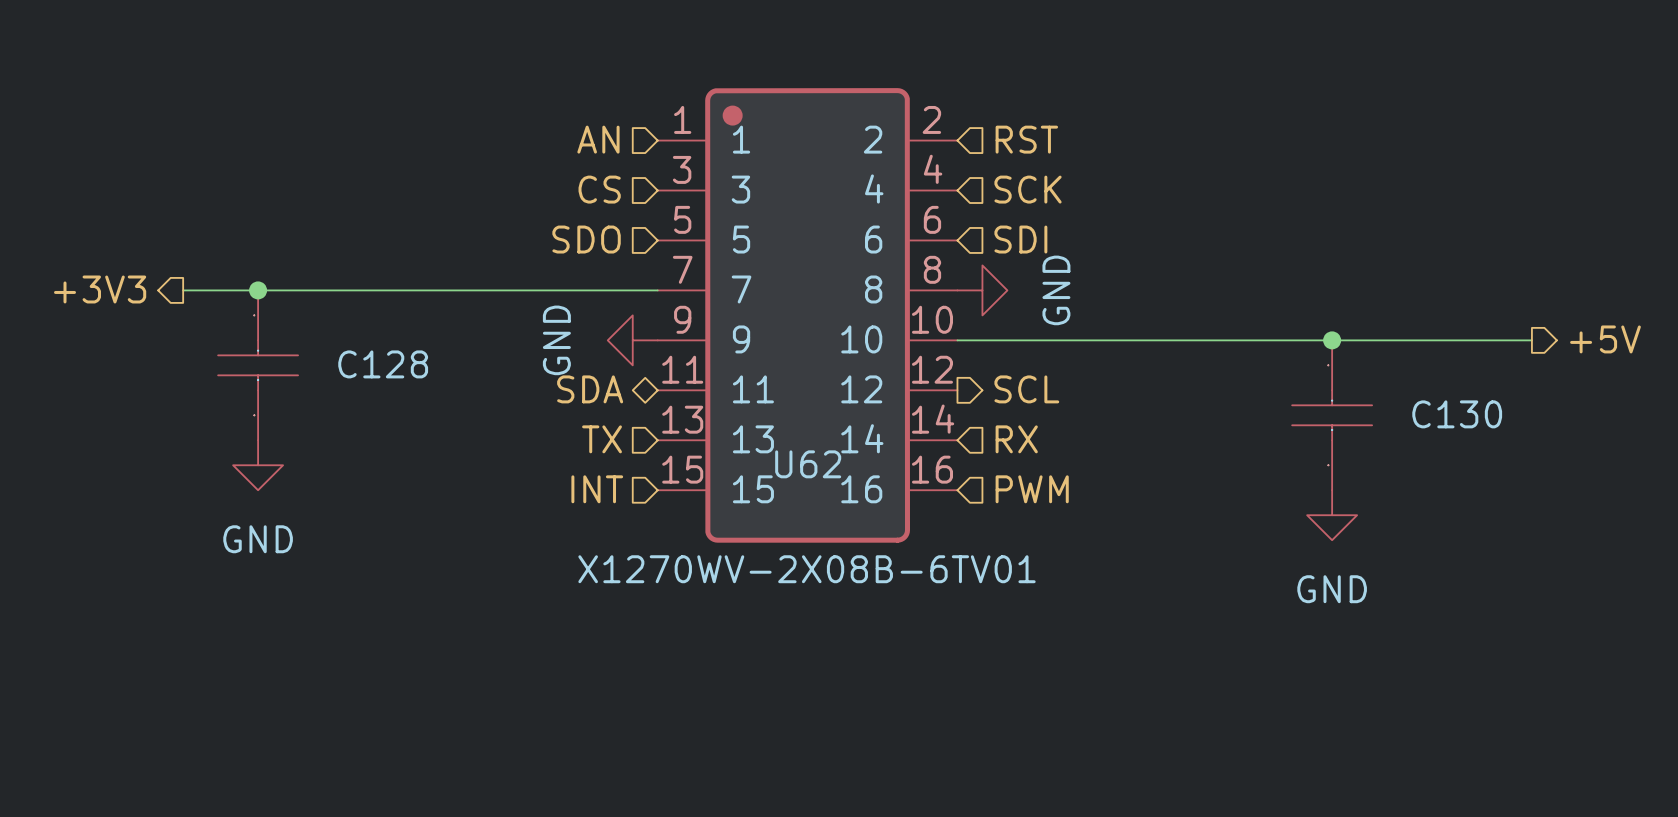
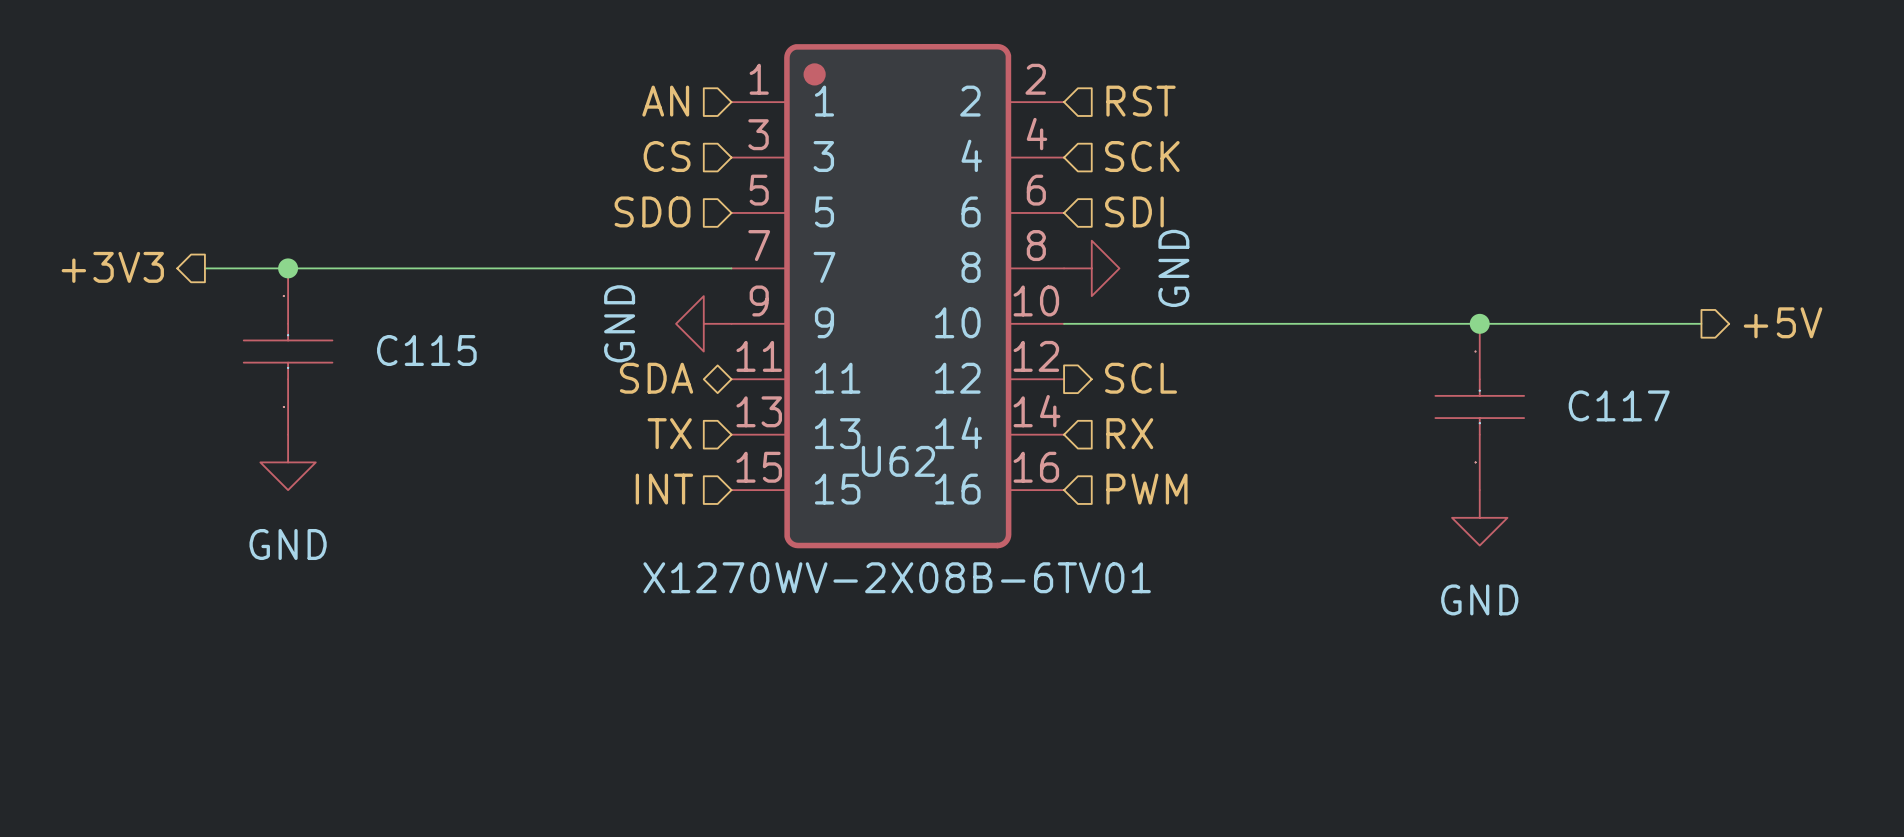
C128 name: C128 (383, 364) -> C115 (426, 350)
C130 name: C130 (1457, 414) -> C117 (1619, 405)

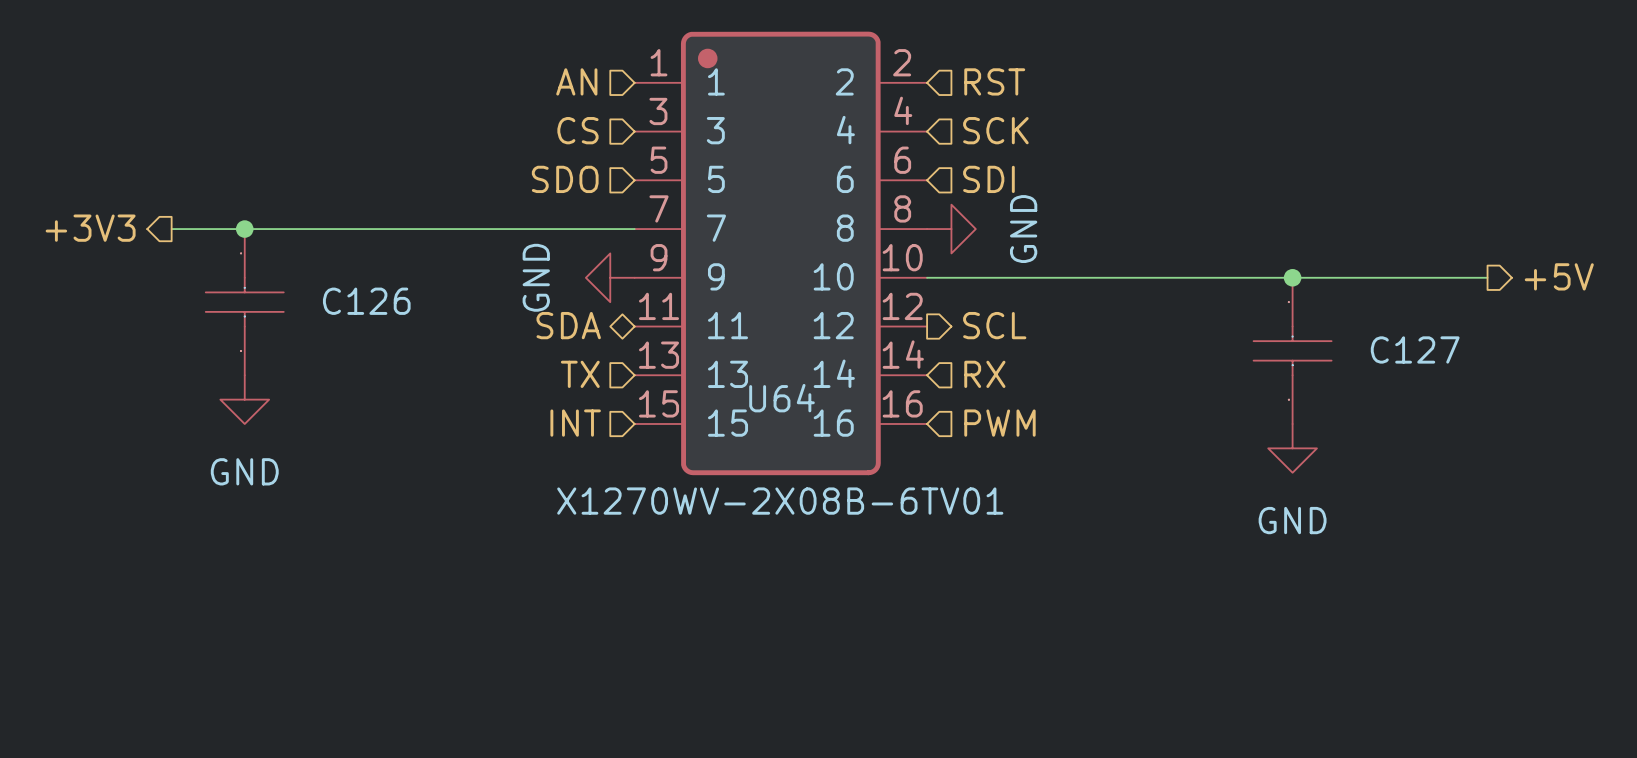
C115 name: C115 (426, 350) -> C126 (366, 301)
C117 name: C117 (1619, 405) -> C127 (1415, 349)
U62 name: U62 (898, 461) -> U64 (782, 398)

